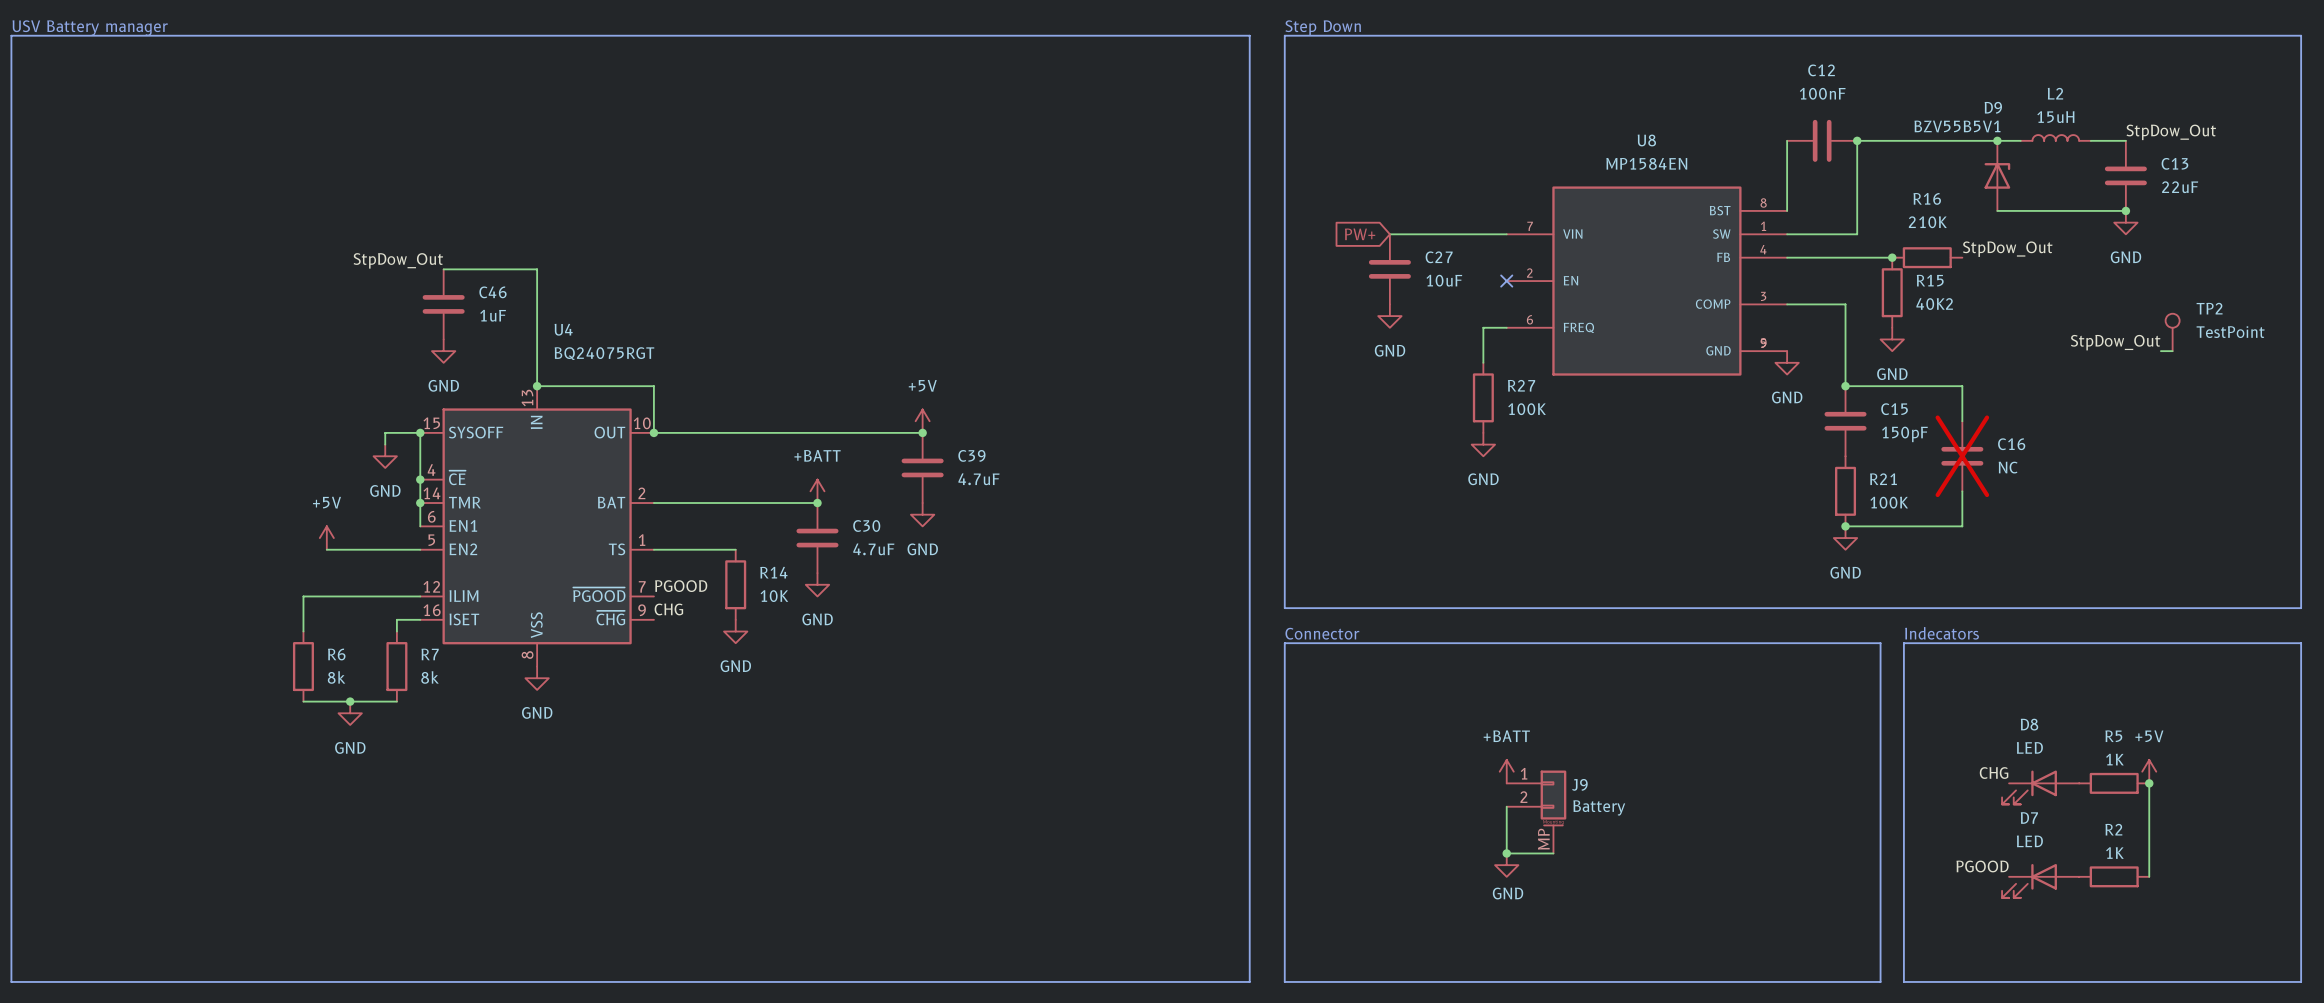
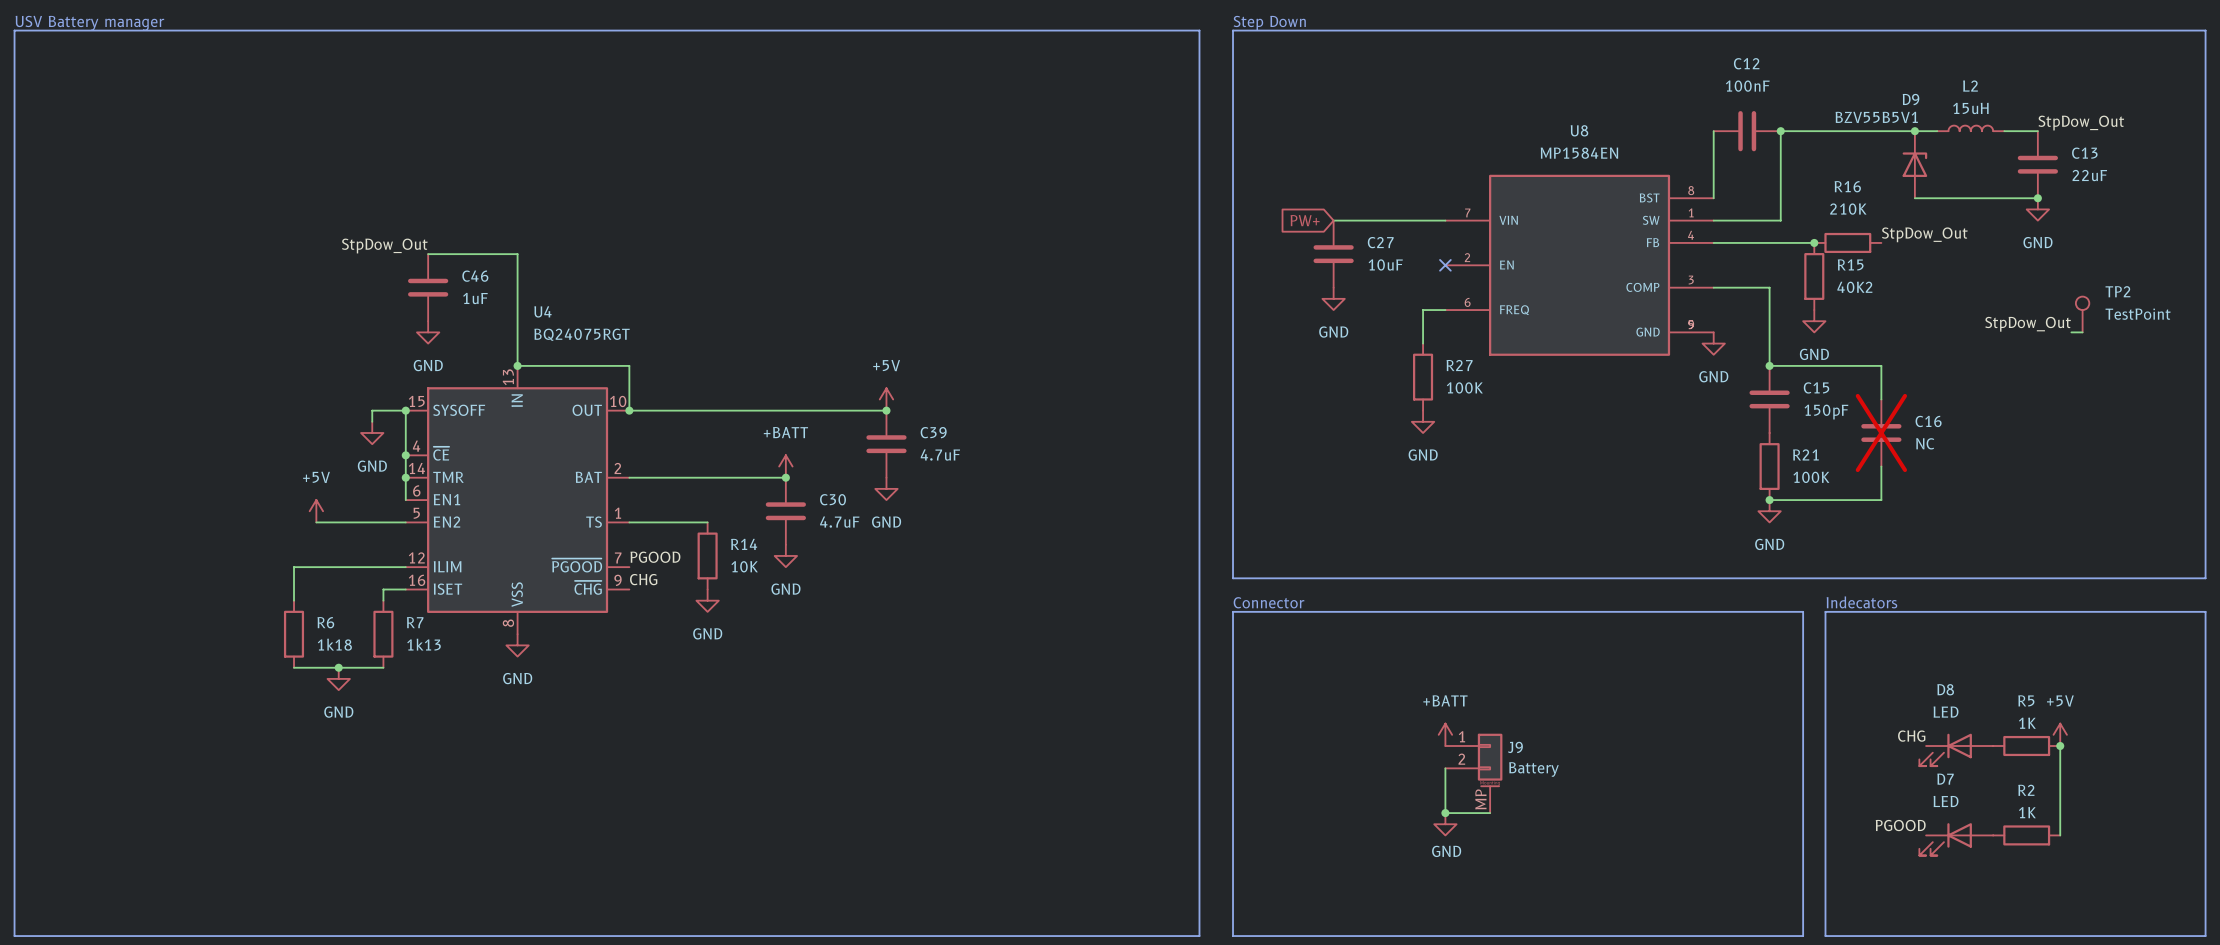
R6 value: 8k (336, 677) -> 1k18 (334, 644)
R7 value: 8k (430, 677) -> 1k13 (424, 644)

